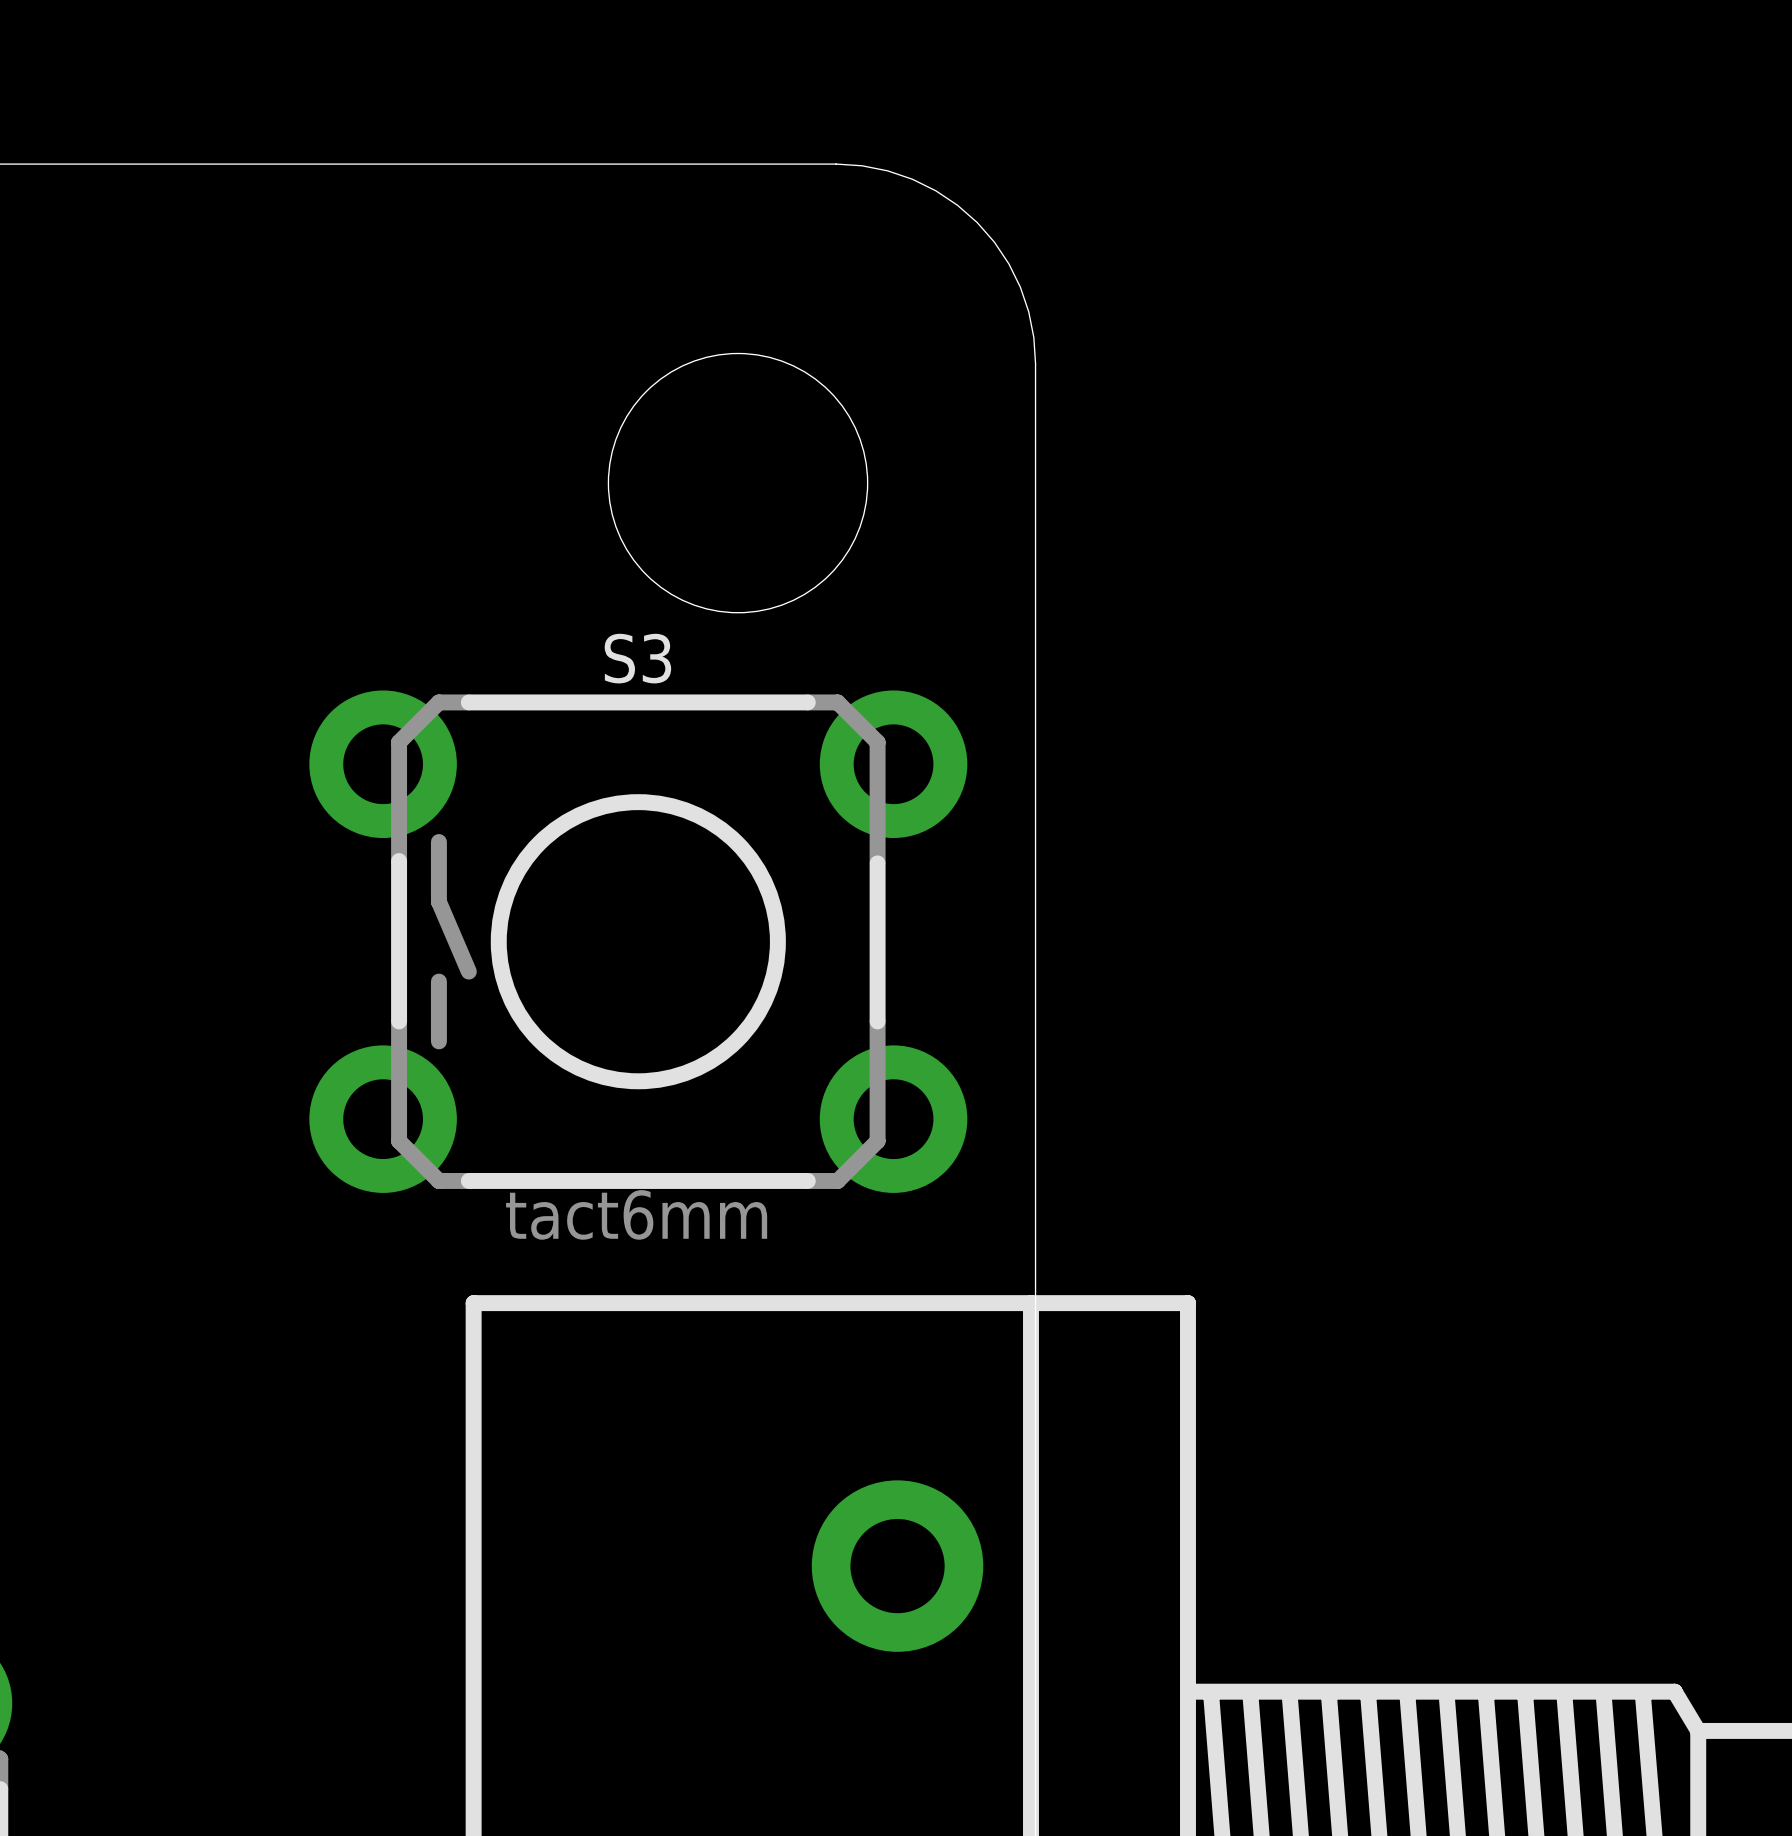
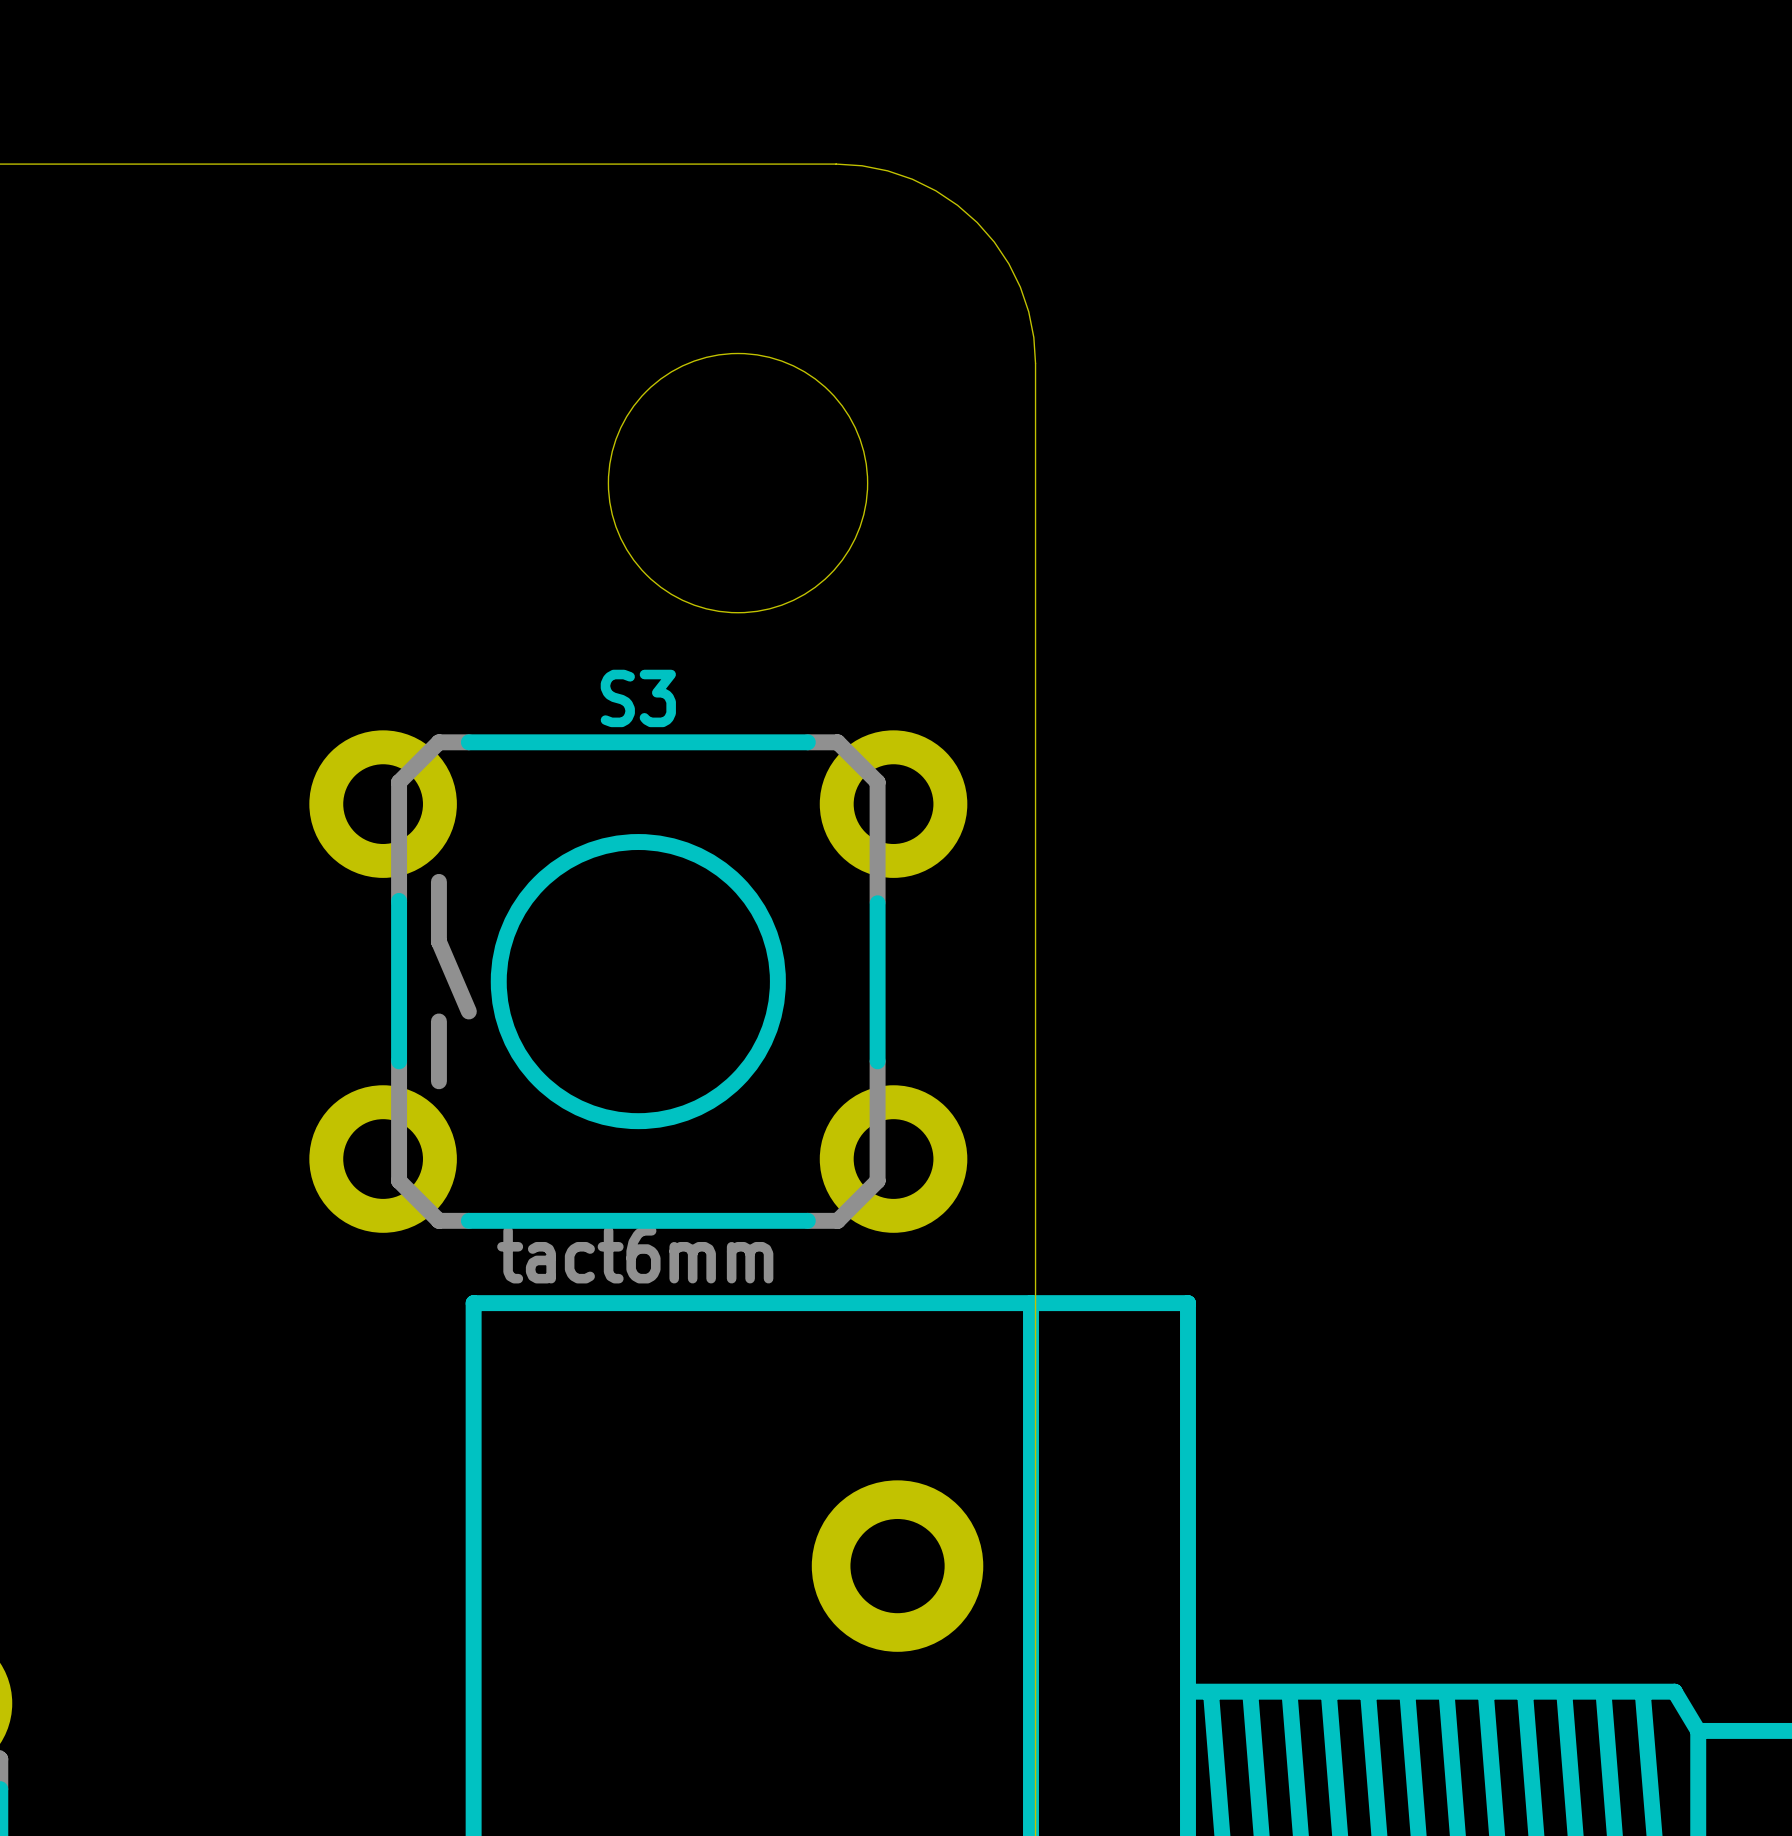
S3 position: (638, 941) -> (638, 981)

